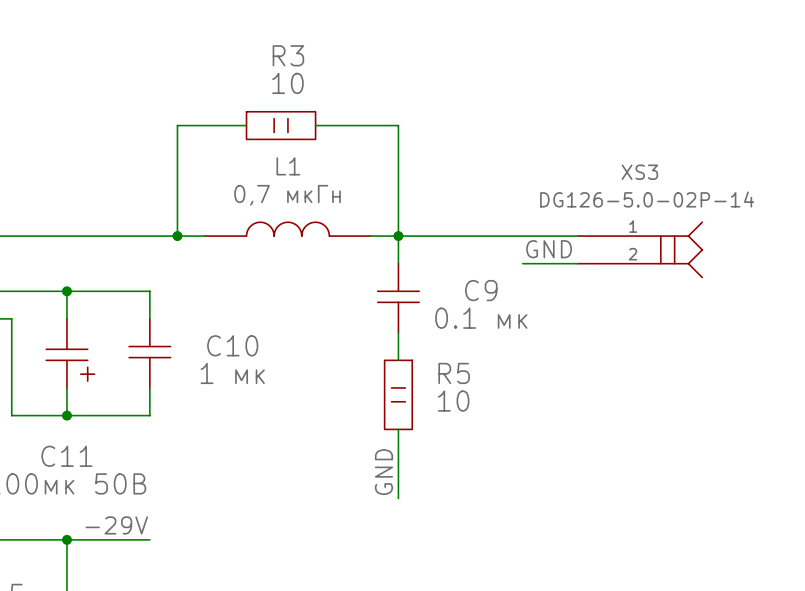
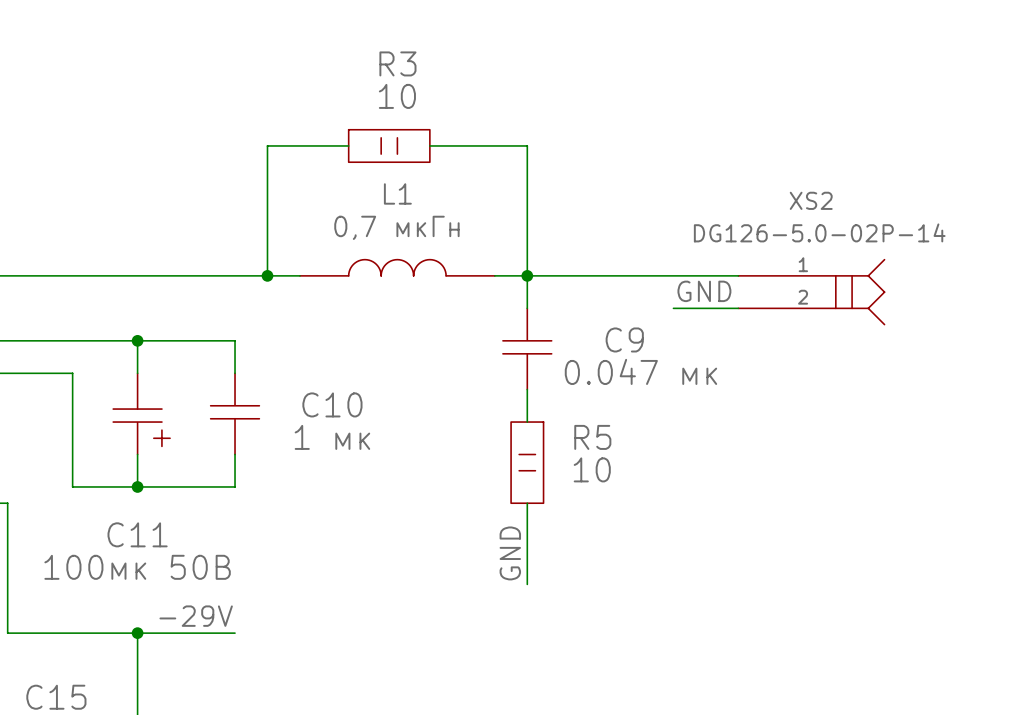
XS3 name: XS3 (639, 172) -> XS2 (811, 200)
C9 value: 0.1 мк (481, 318) -> 0.047 мк (640, 371)

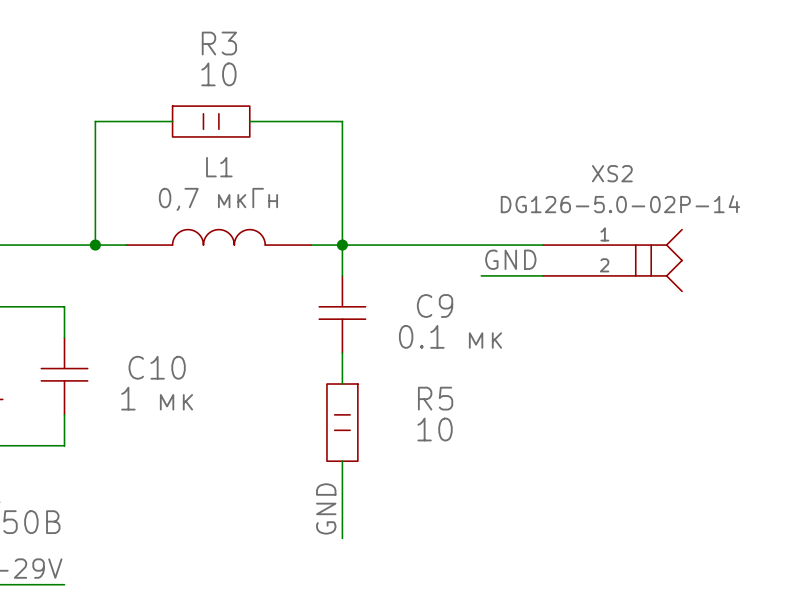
C9 value: 0.047 мк (640, 371) -> 0.1 мк (450, 336)
R5 name position: R5 (592, 437) -> R5 (435, 398)
R5 value position: 10 (592, 469) -> 10 (435, 429)

